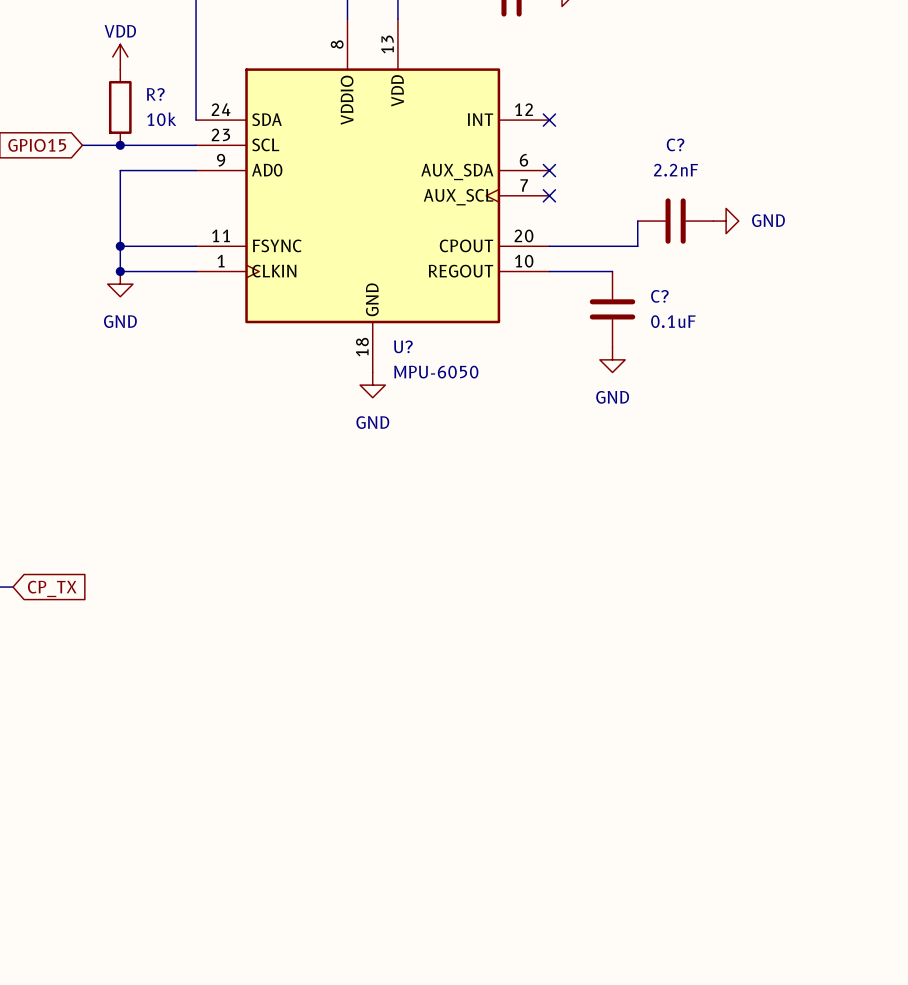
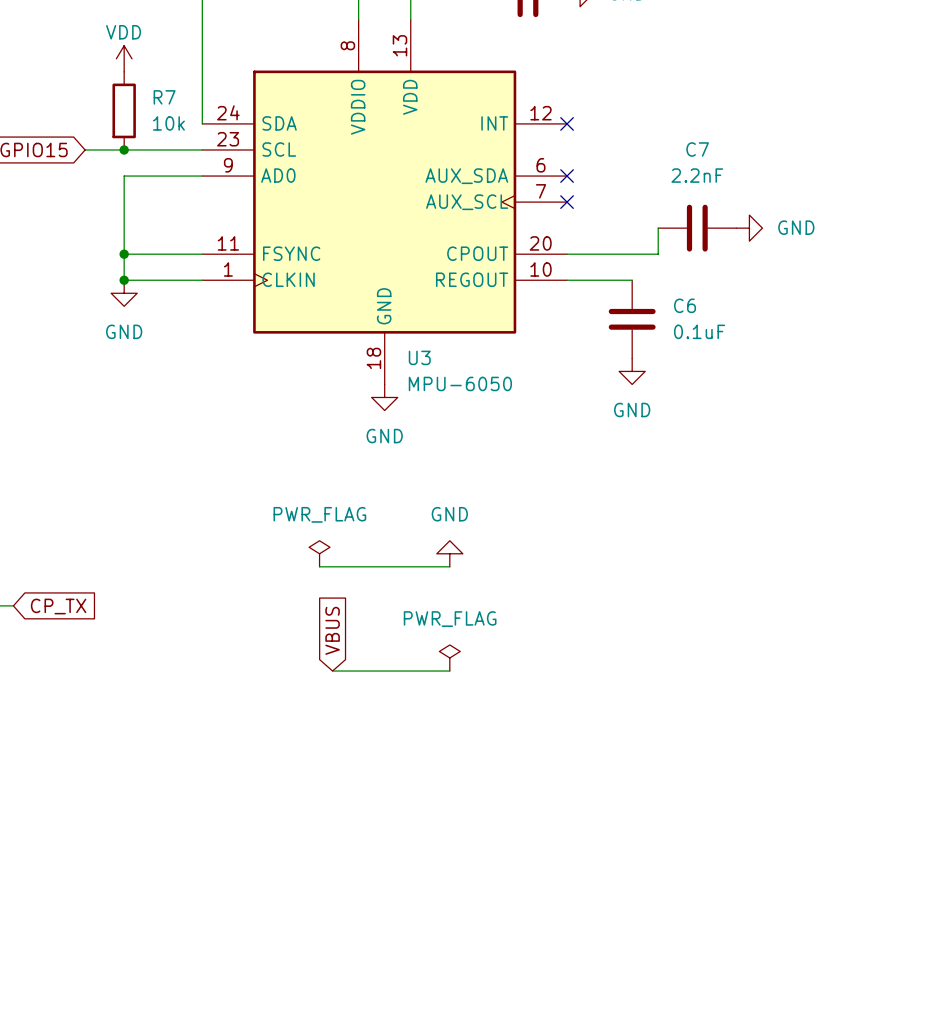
R? name: R? (155, 94) -> R7 (164, 97)
C? name: C? (675, 144) -> C7 (697, 149)
C? name: C? (659, 296) -> C6 (685, 305)
U? name: U? (403, 346) -> U3 (419, 357)
power symbol: none -> PWR_FLAG (319, 553)
power symbol: none -> GND (449, 553)
wire: none -> (319, 566) (449, 566)
global label: none -> VBUS (332, 630)
power symbol: none -> PWR_FLAG (449, 657)
wire: none -> (332, 671) (449, 671)

